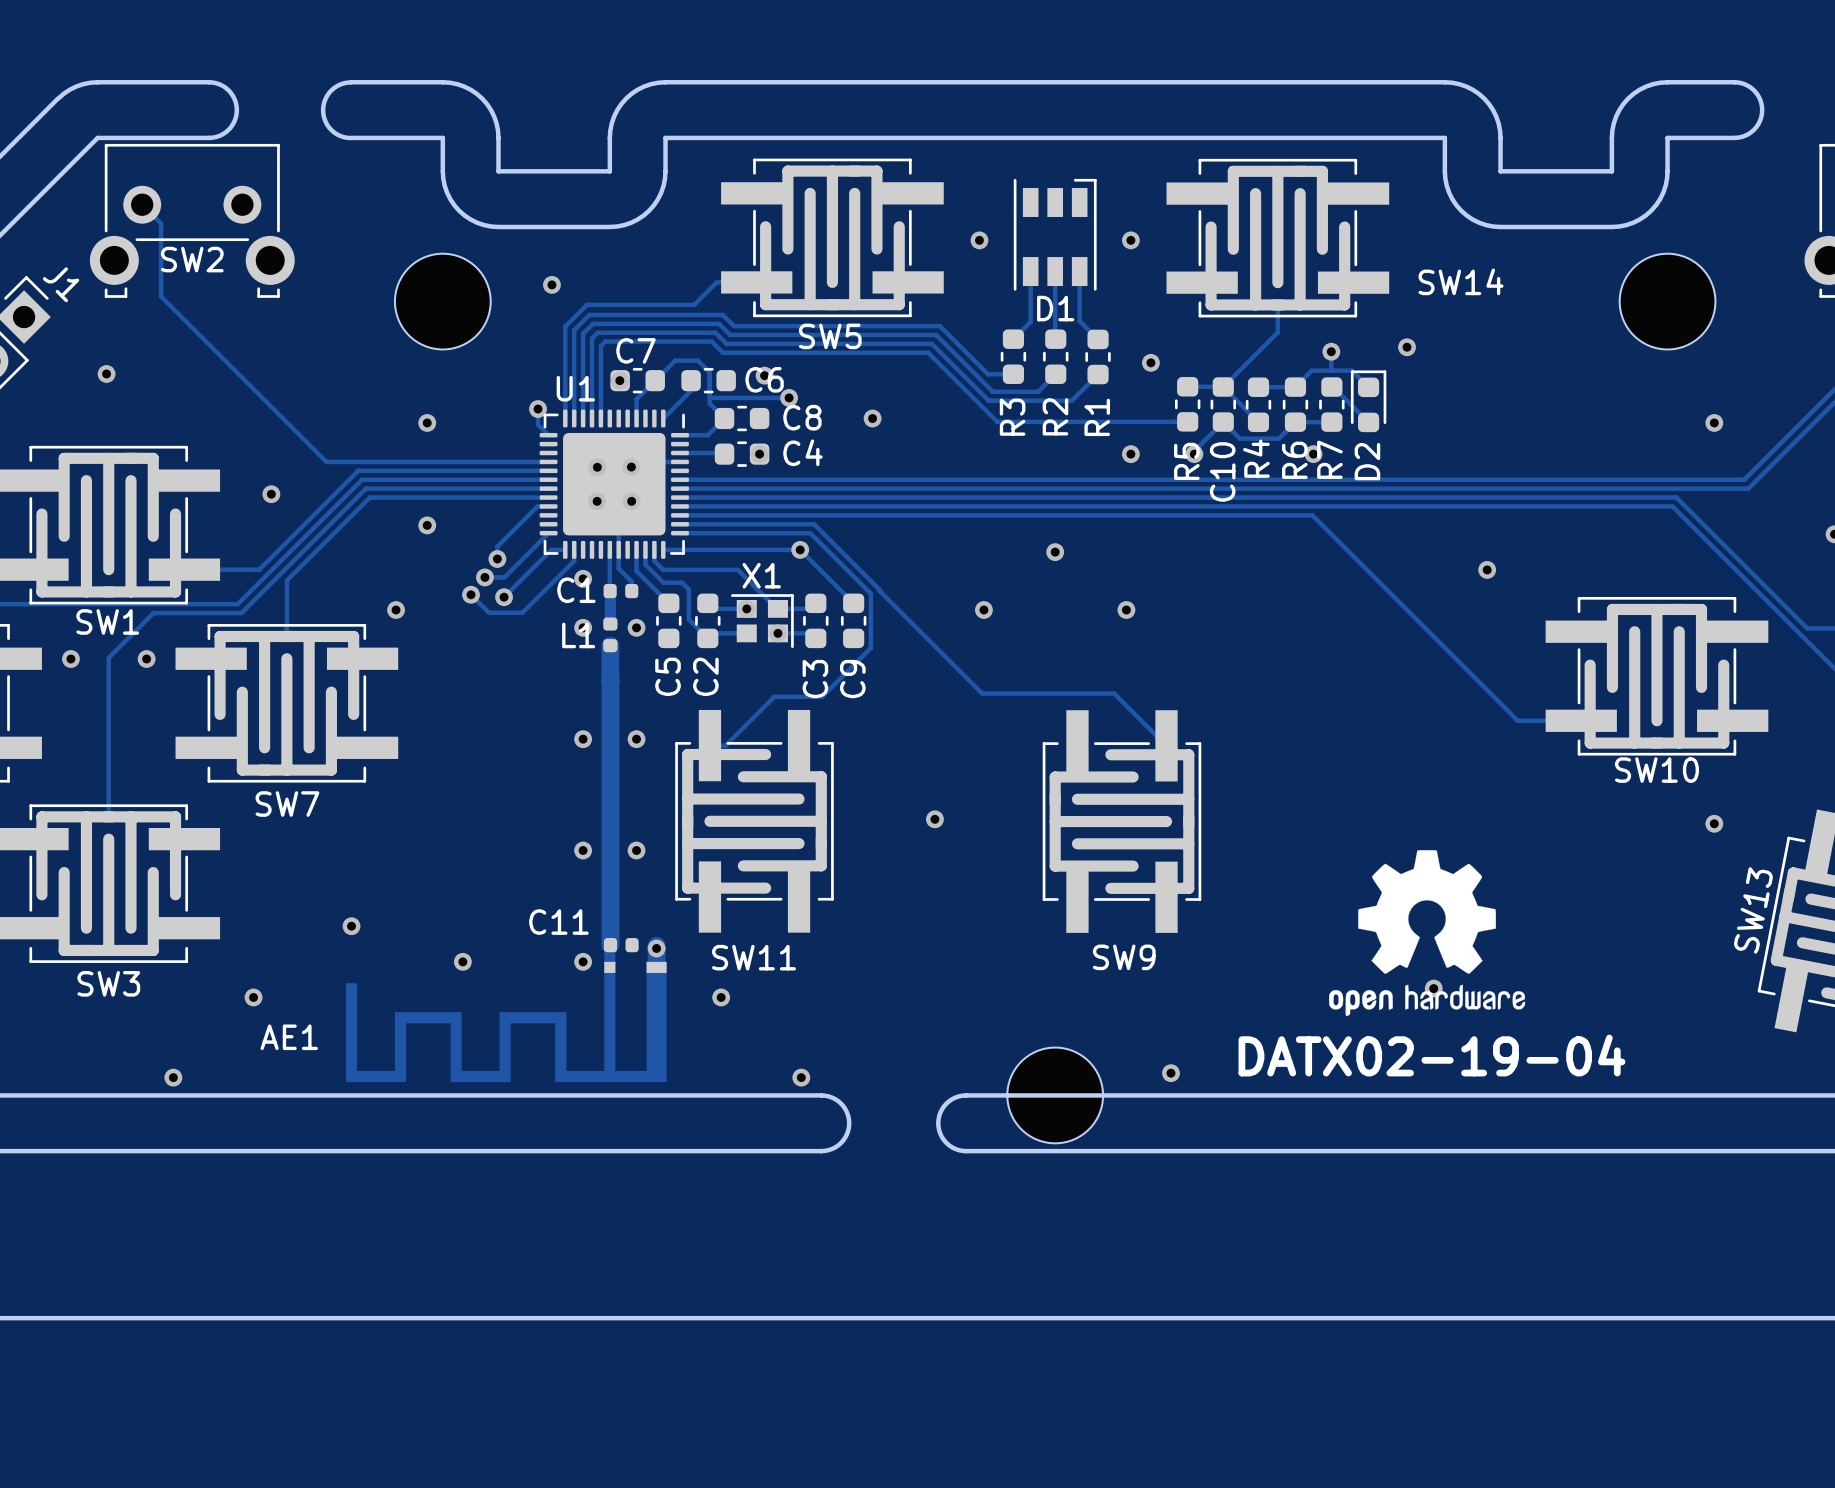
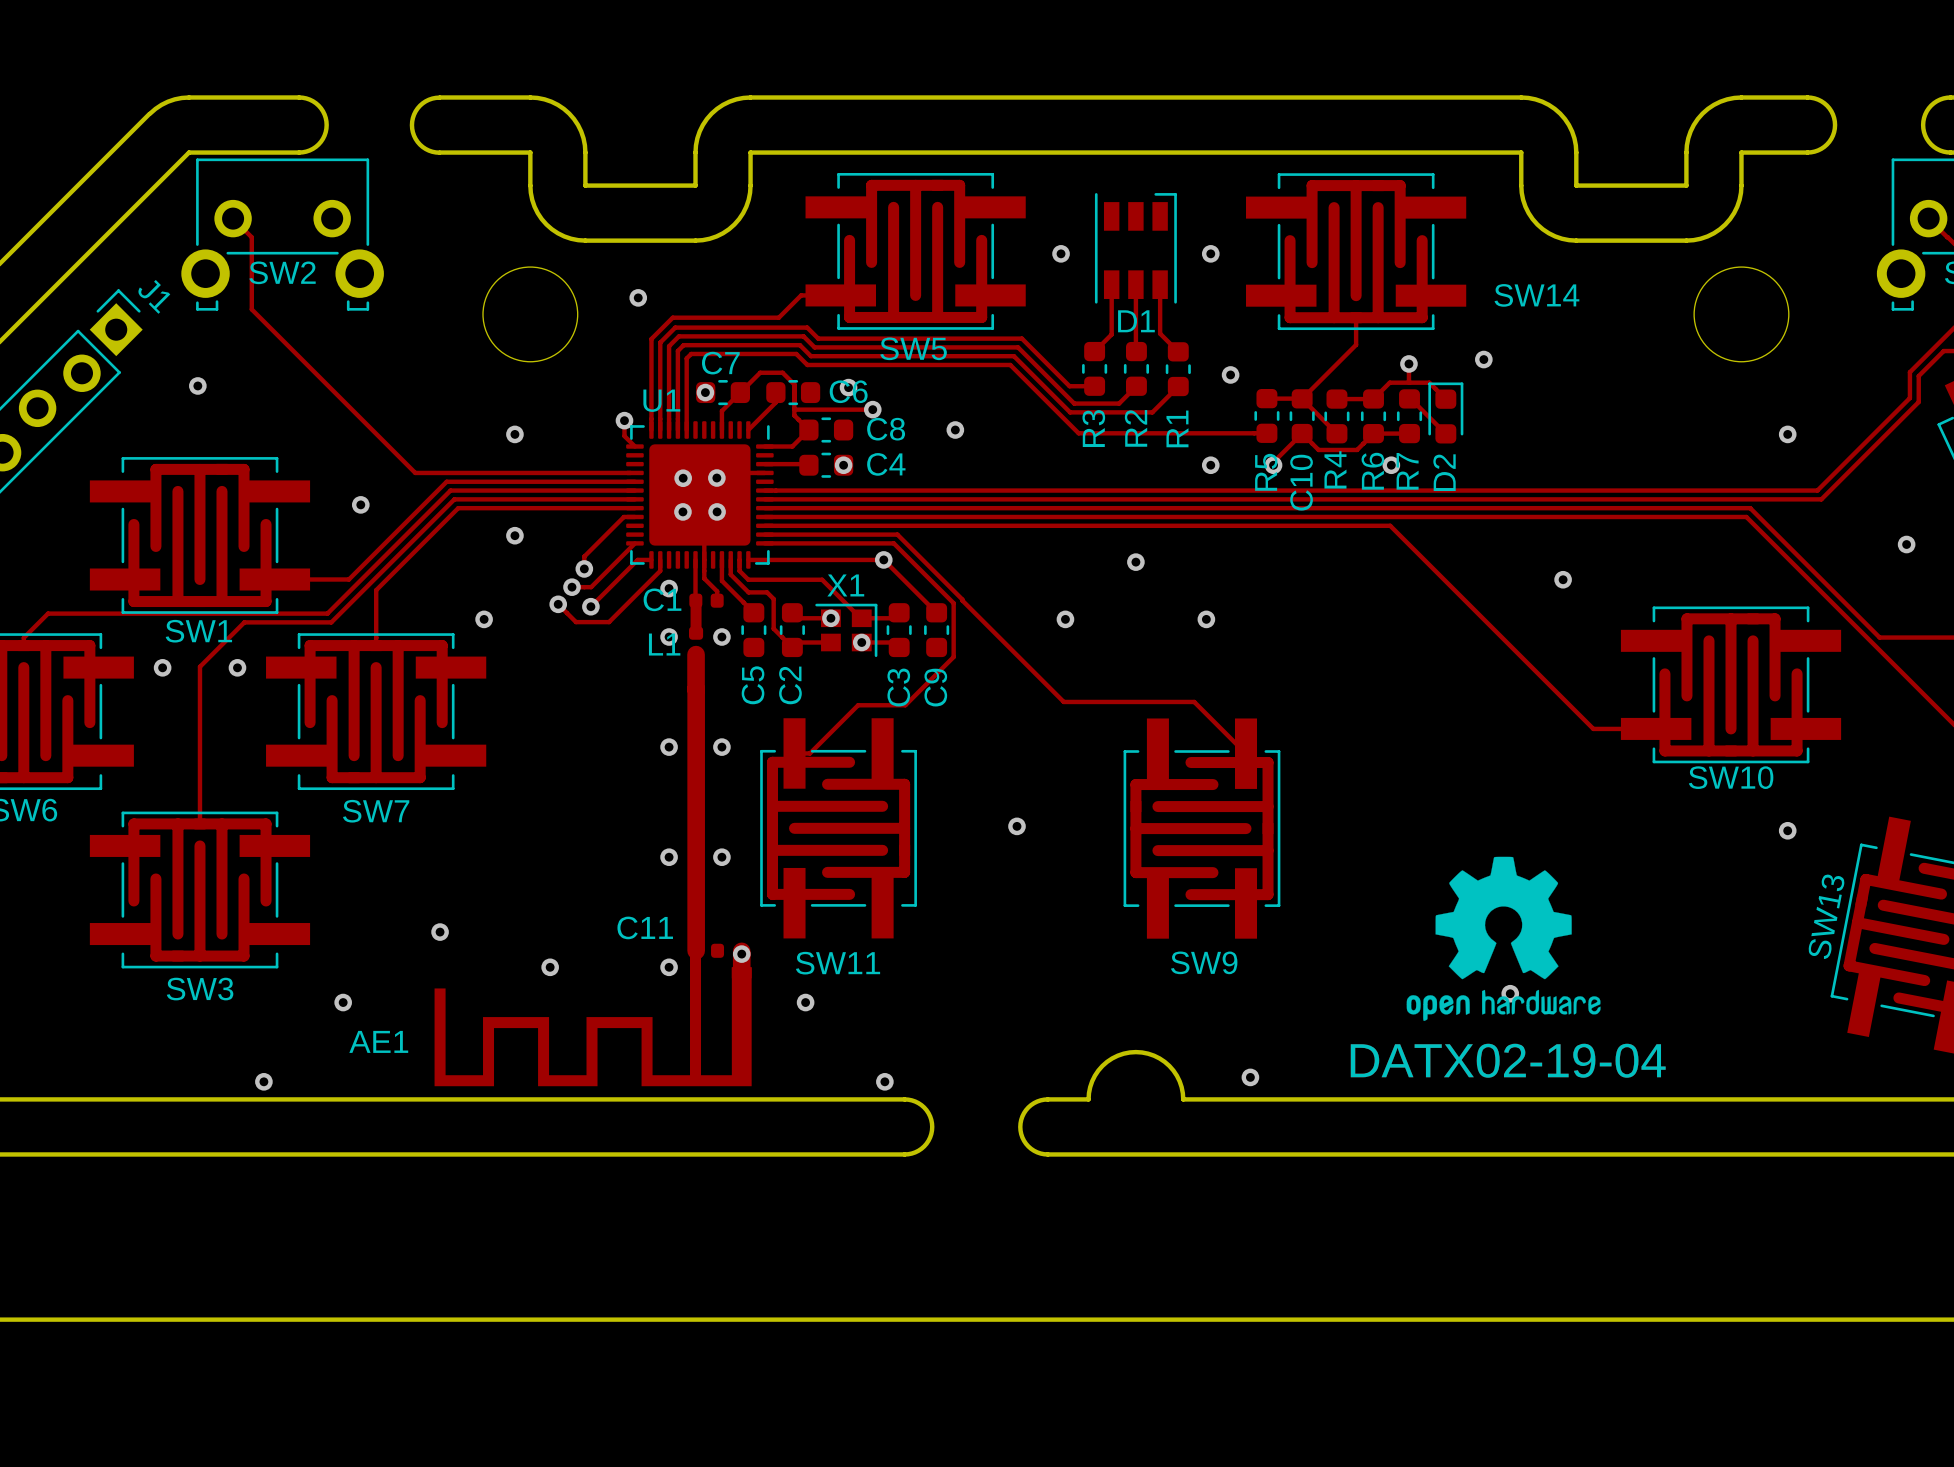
board edge: (1007, 1095) (1103, 1095) -> (1088, 1099) (1092, 1081) (1102, 1065) (1117, 1055) (1135, 1052) (1154, 1055) (1169, 1065) (1179, 1081) (1183, 1099)
part: (1055, 1095) -> none

